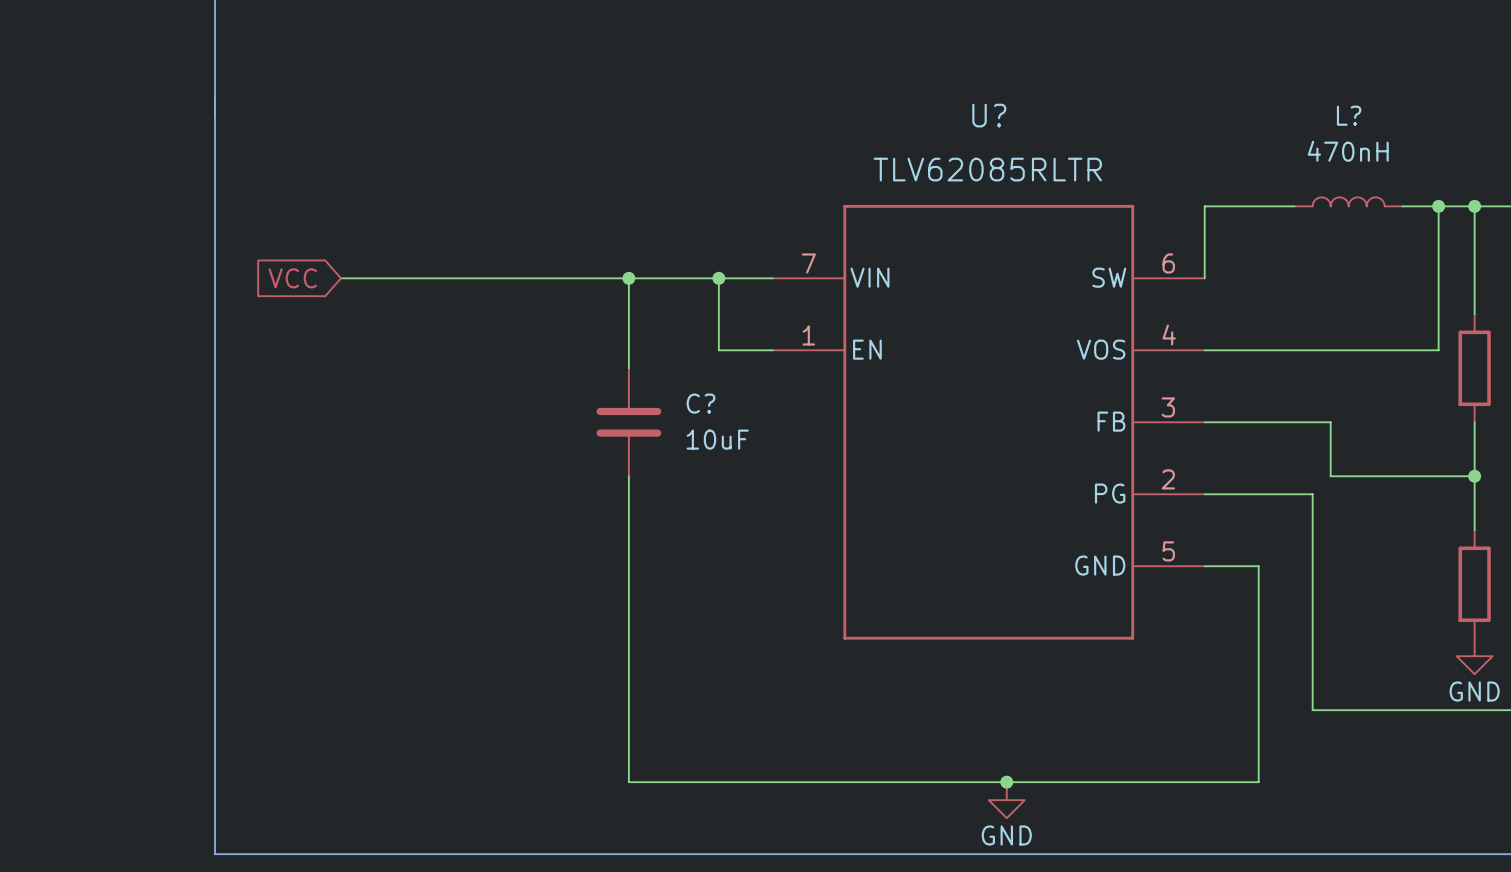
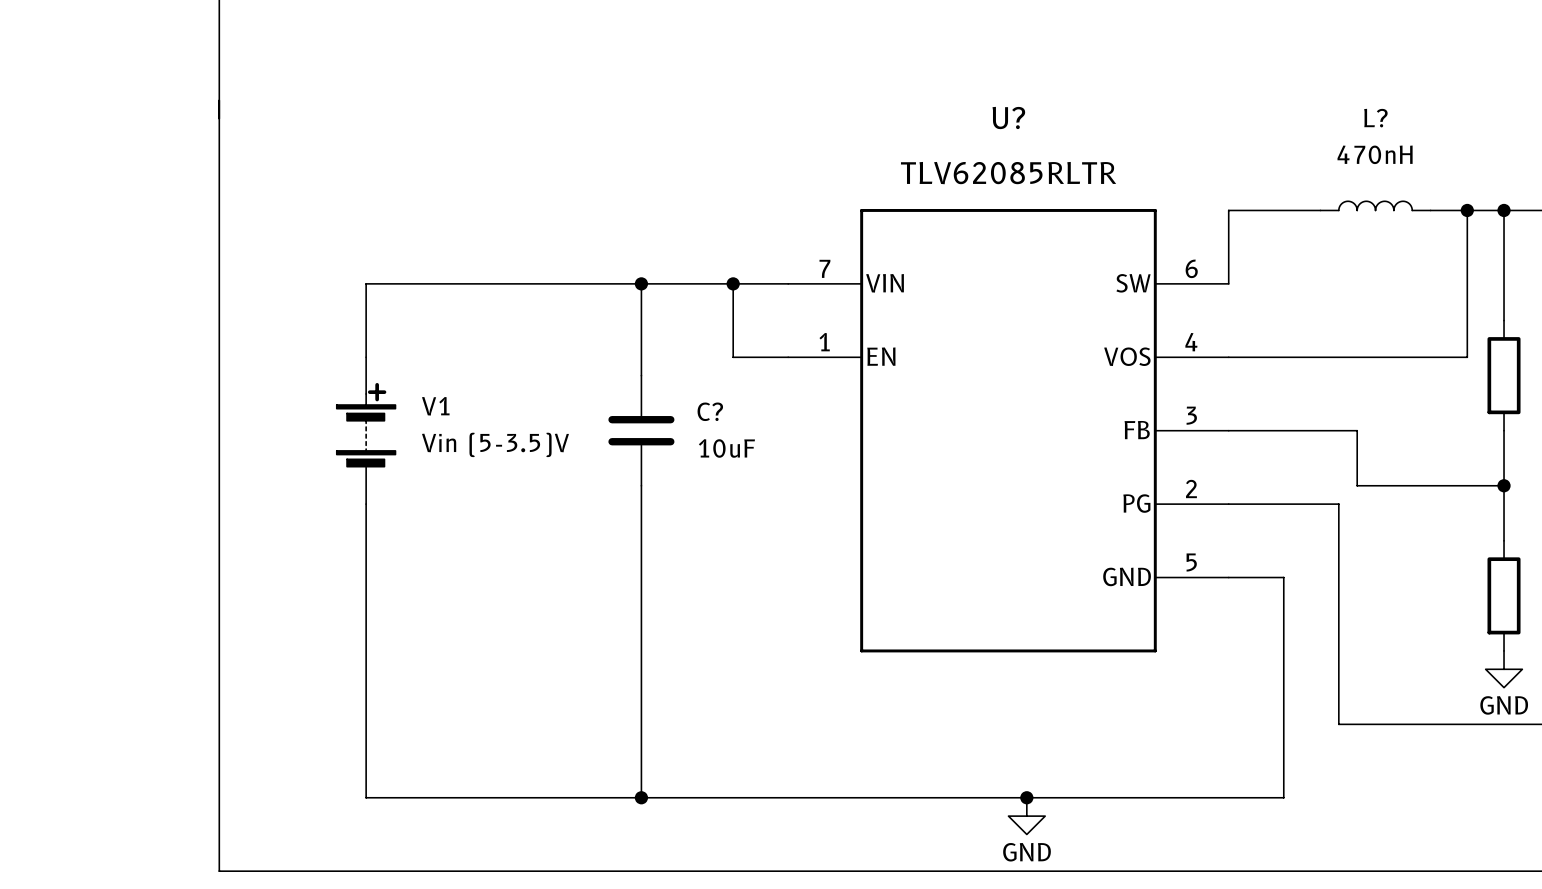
global label: VCC (292, 278) -> none
wire: (340, 278) (358, 278) -> (366, 357) (366, 283)
V1: none -> Vin (5-3.5)V (366, 430)
wire: none -> (366, 504) (366, 797) (641, 797)
junction: none -> (641, 797)

